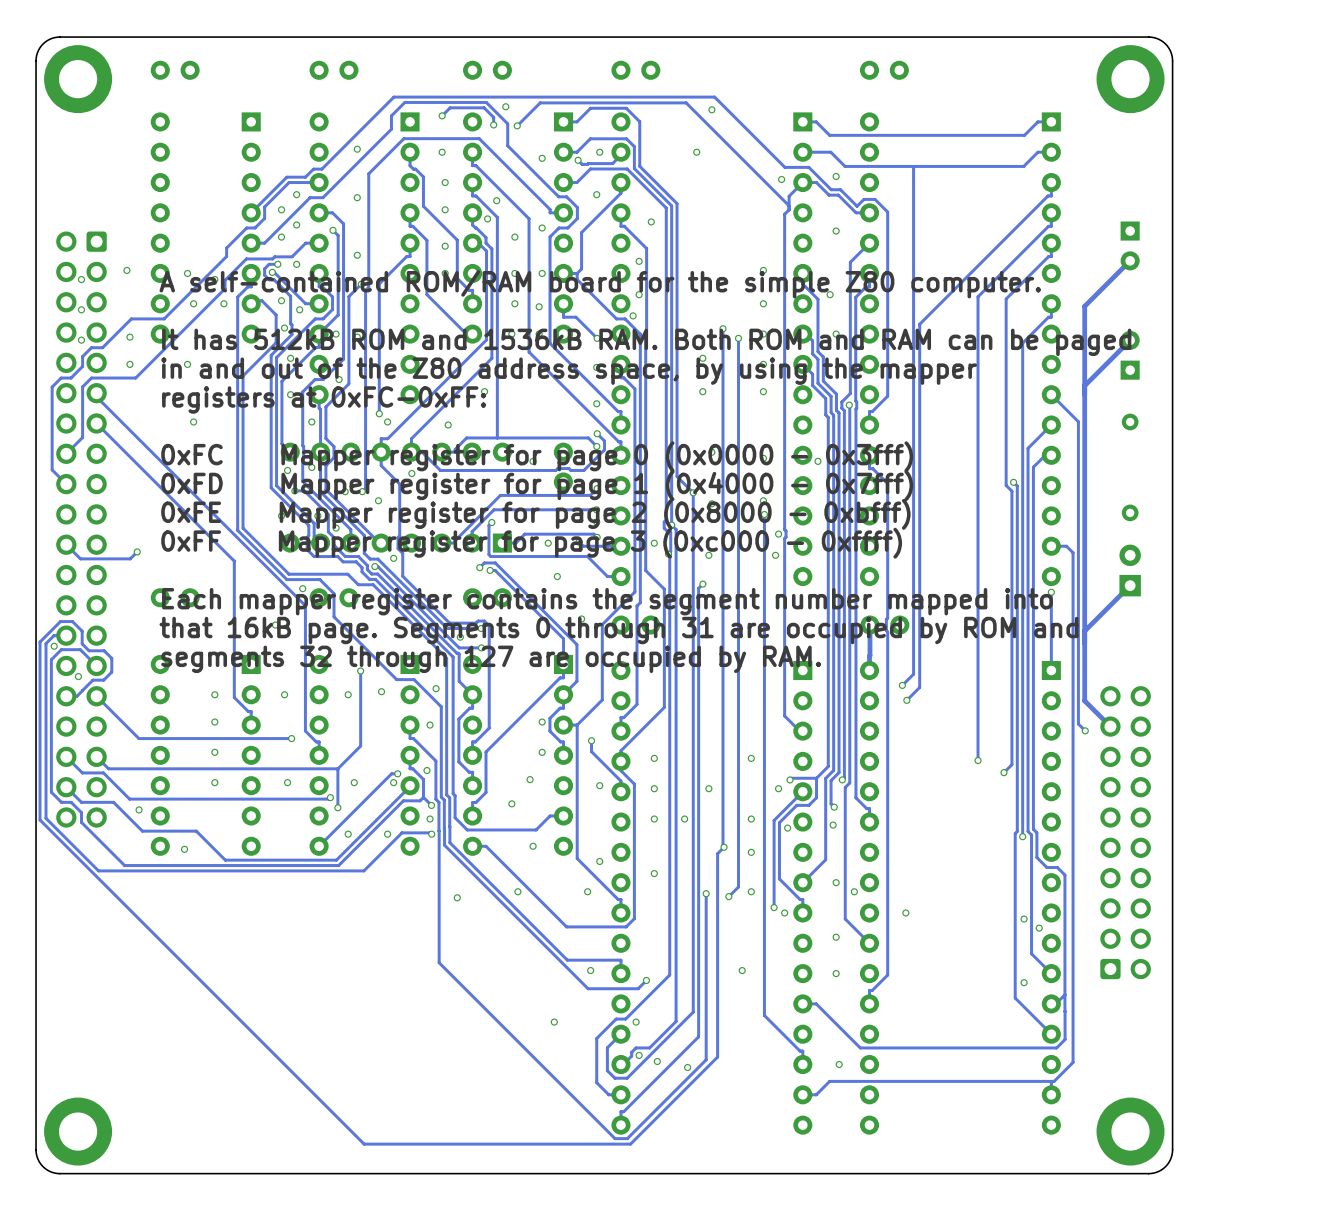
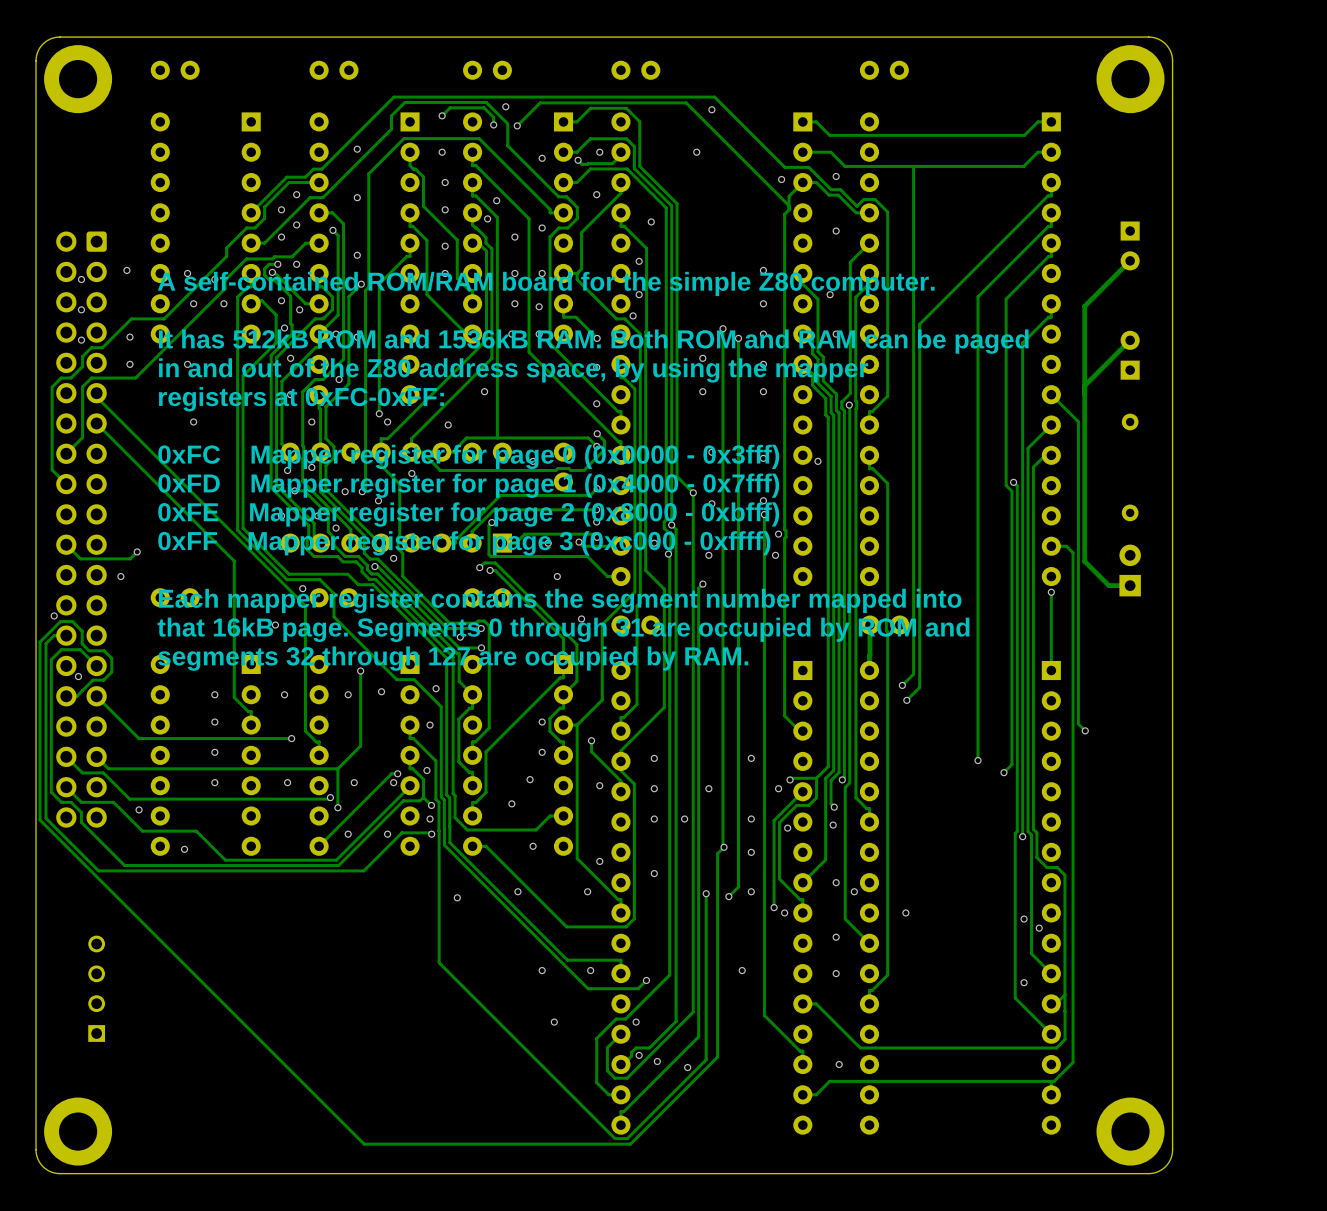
track: (1084, 561) (1084, 700) (1110, 726) -> none
via: none -> (120, 576)
track: (1130, 585) (1084, 631) -> (1130, 585) (1108, 585) (1084, 561)
via position: (54, 646) -> (54, 615)
part: (1125, 832) -> none
via: none -> (542, 970)
part: none -> (96, 988)

